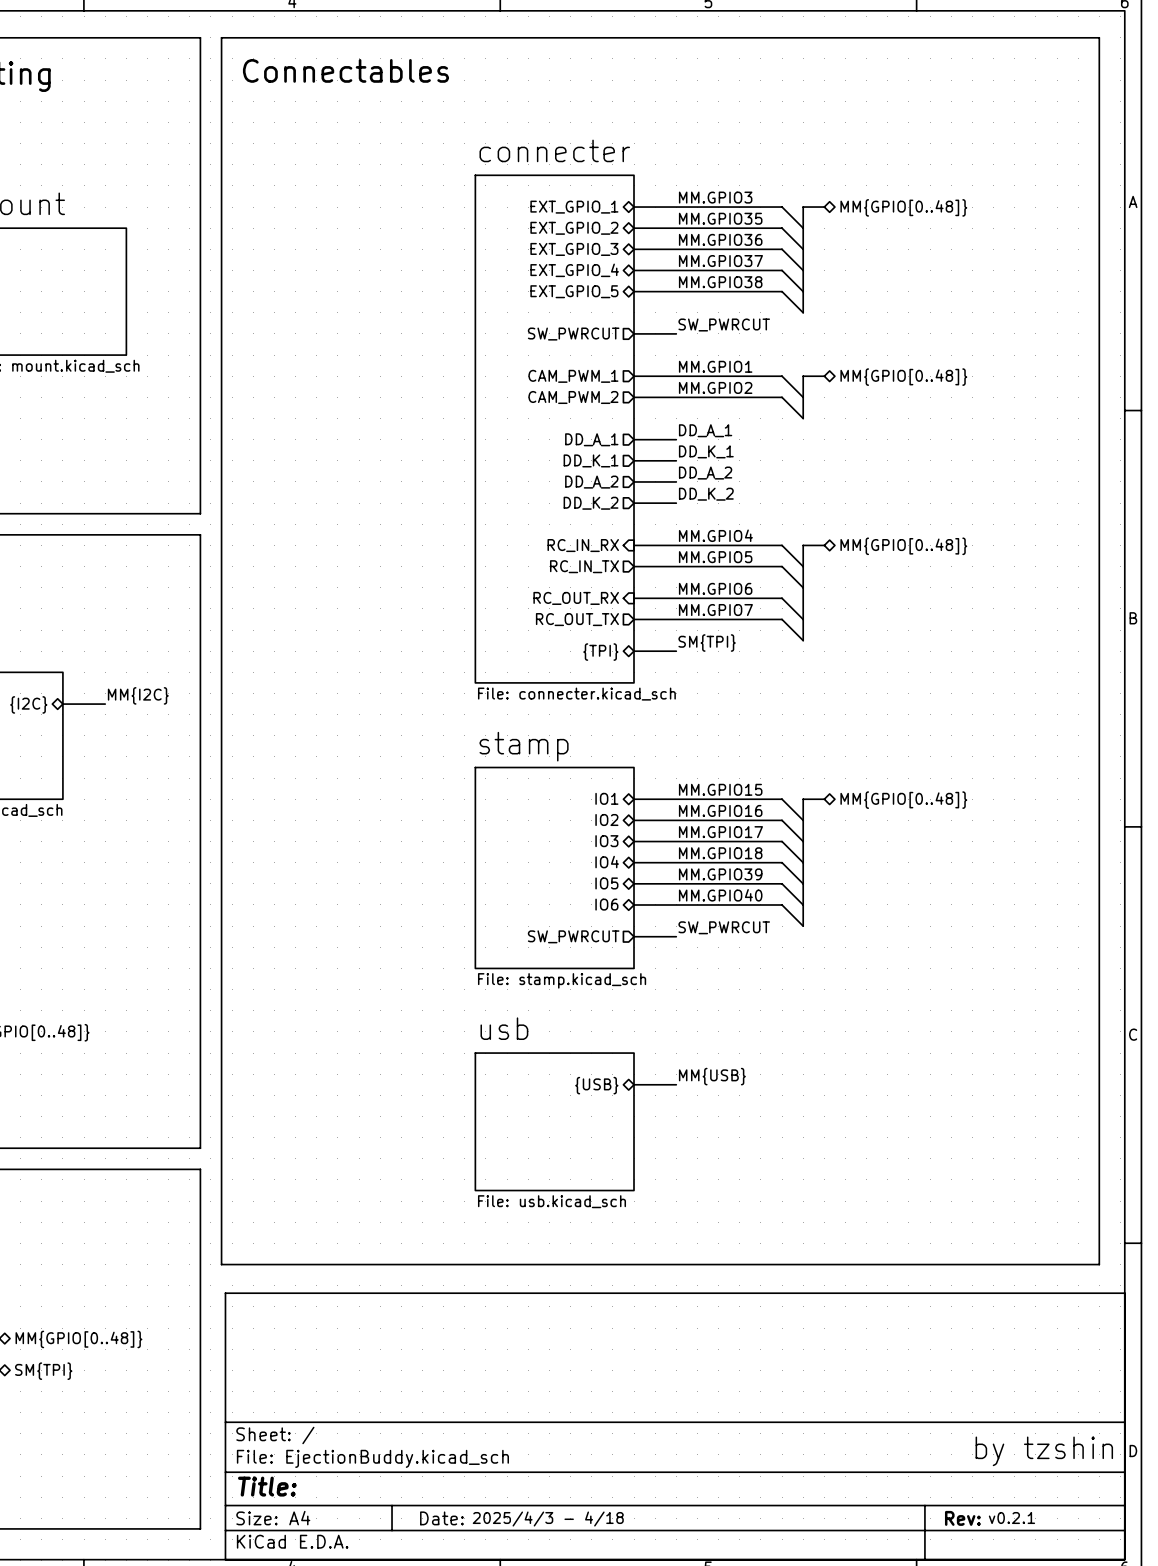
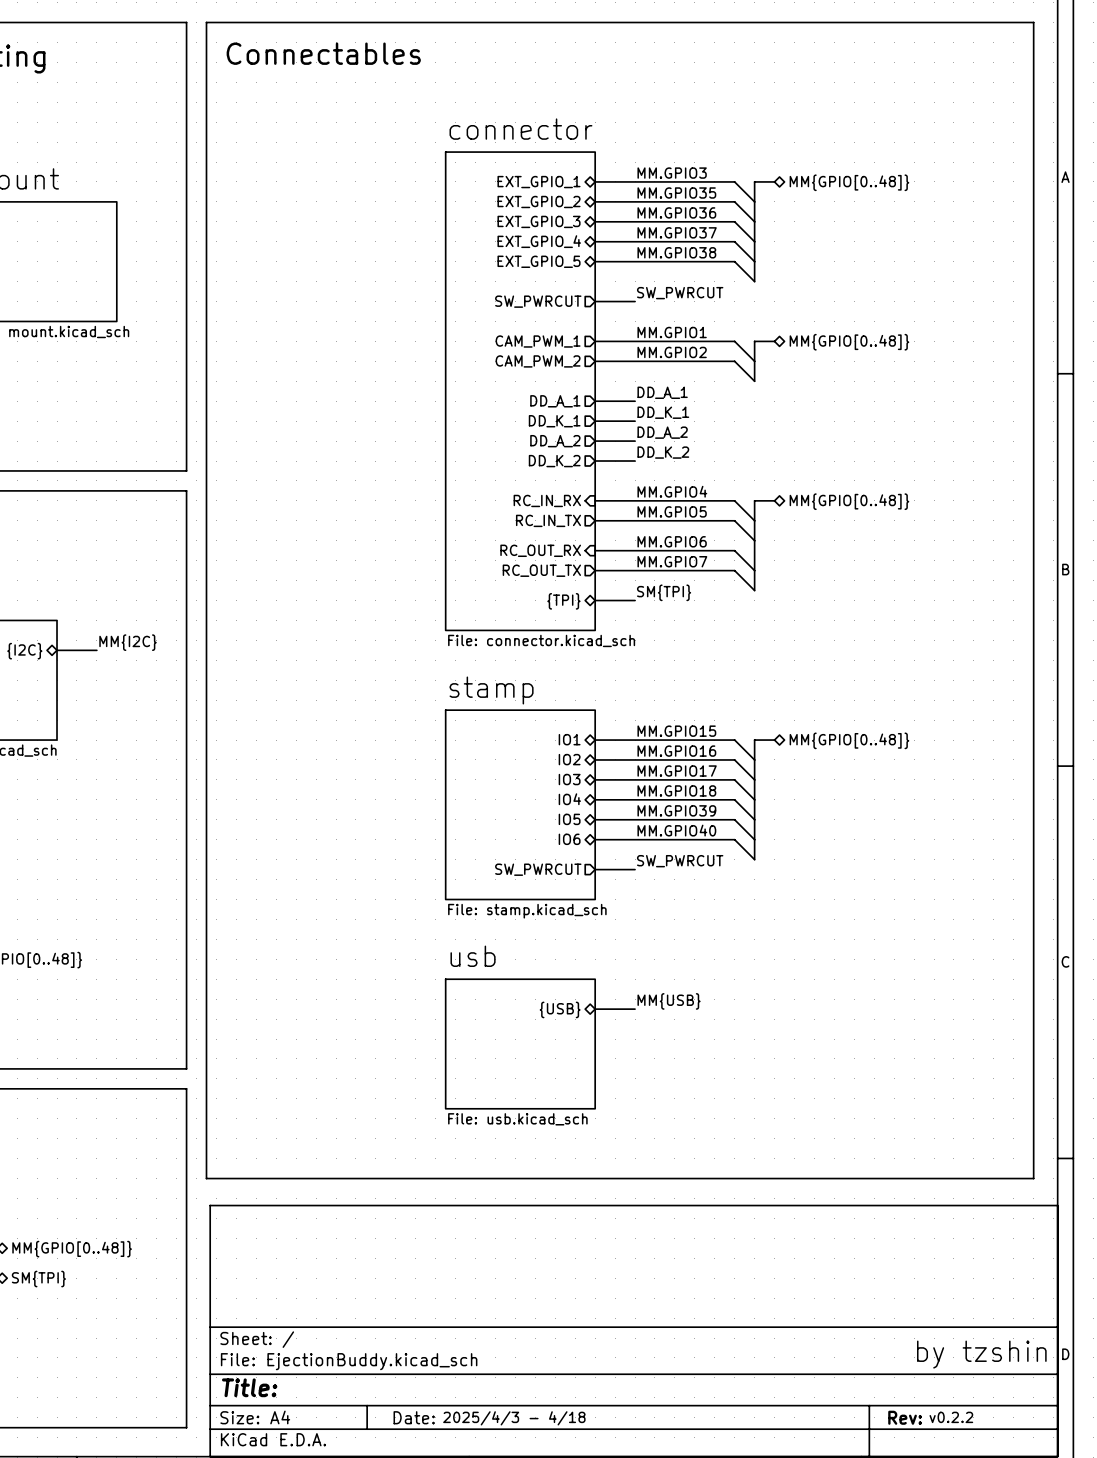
sheet connecter name: connecter (554, 150) -> connector (520, 129)
sheet connecter value: File: connecter.kicad_sch (576, 694) -> File: connector.kicad_sch (541, 640)
text: v0.2.1 (1011, 1518) -> v0.2.2 (951, 1417)

